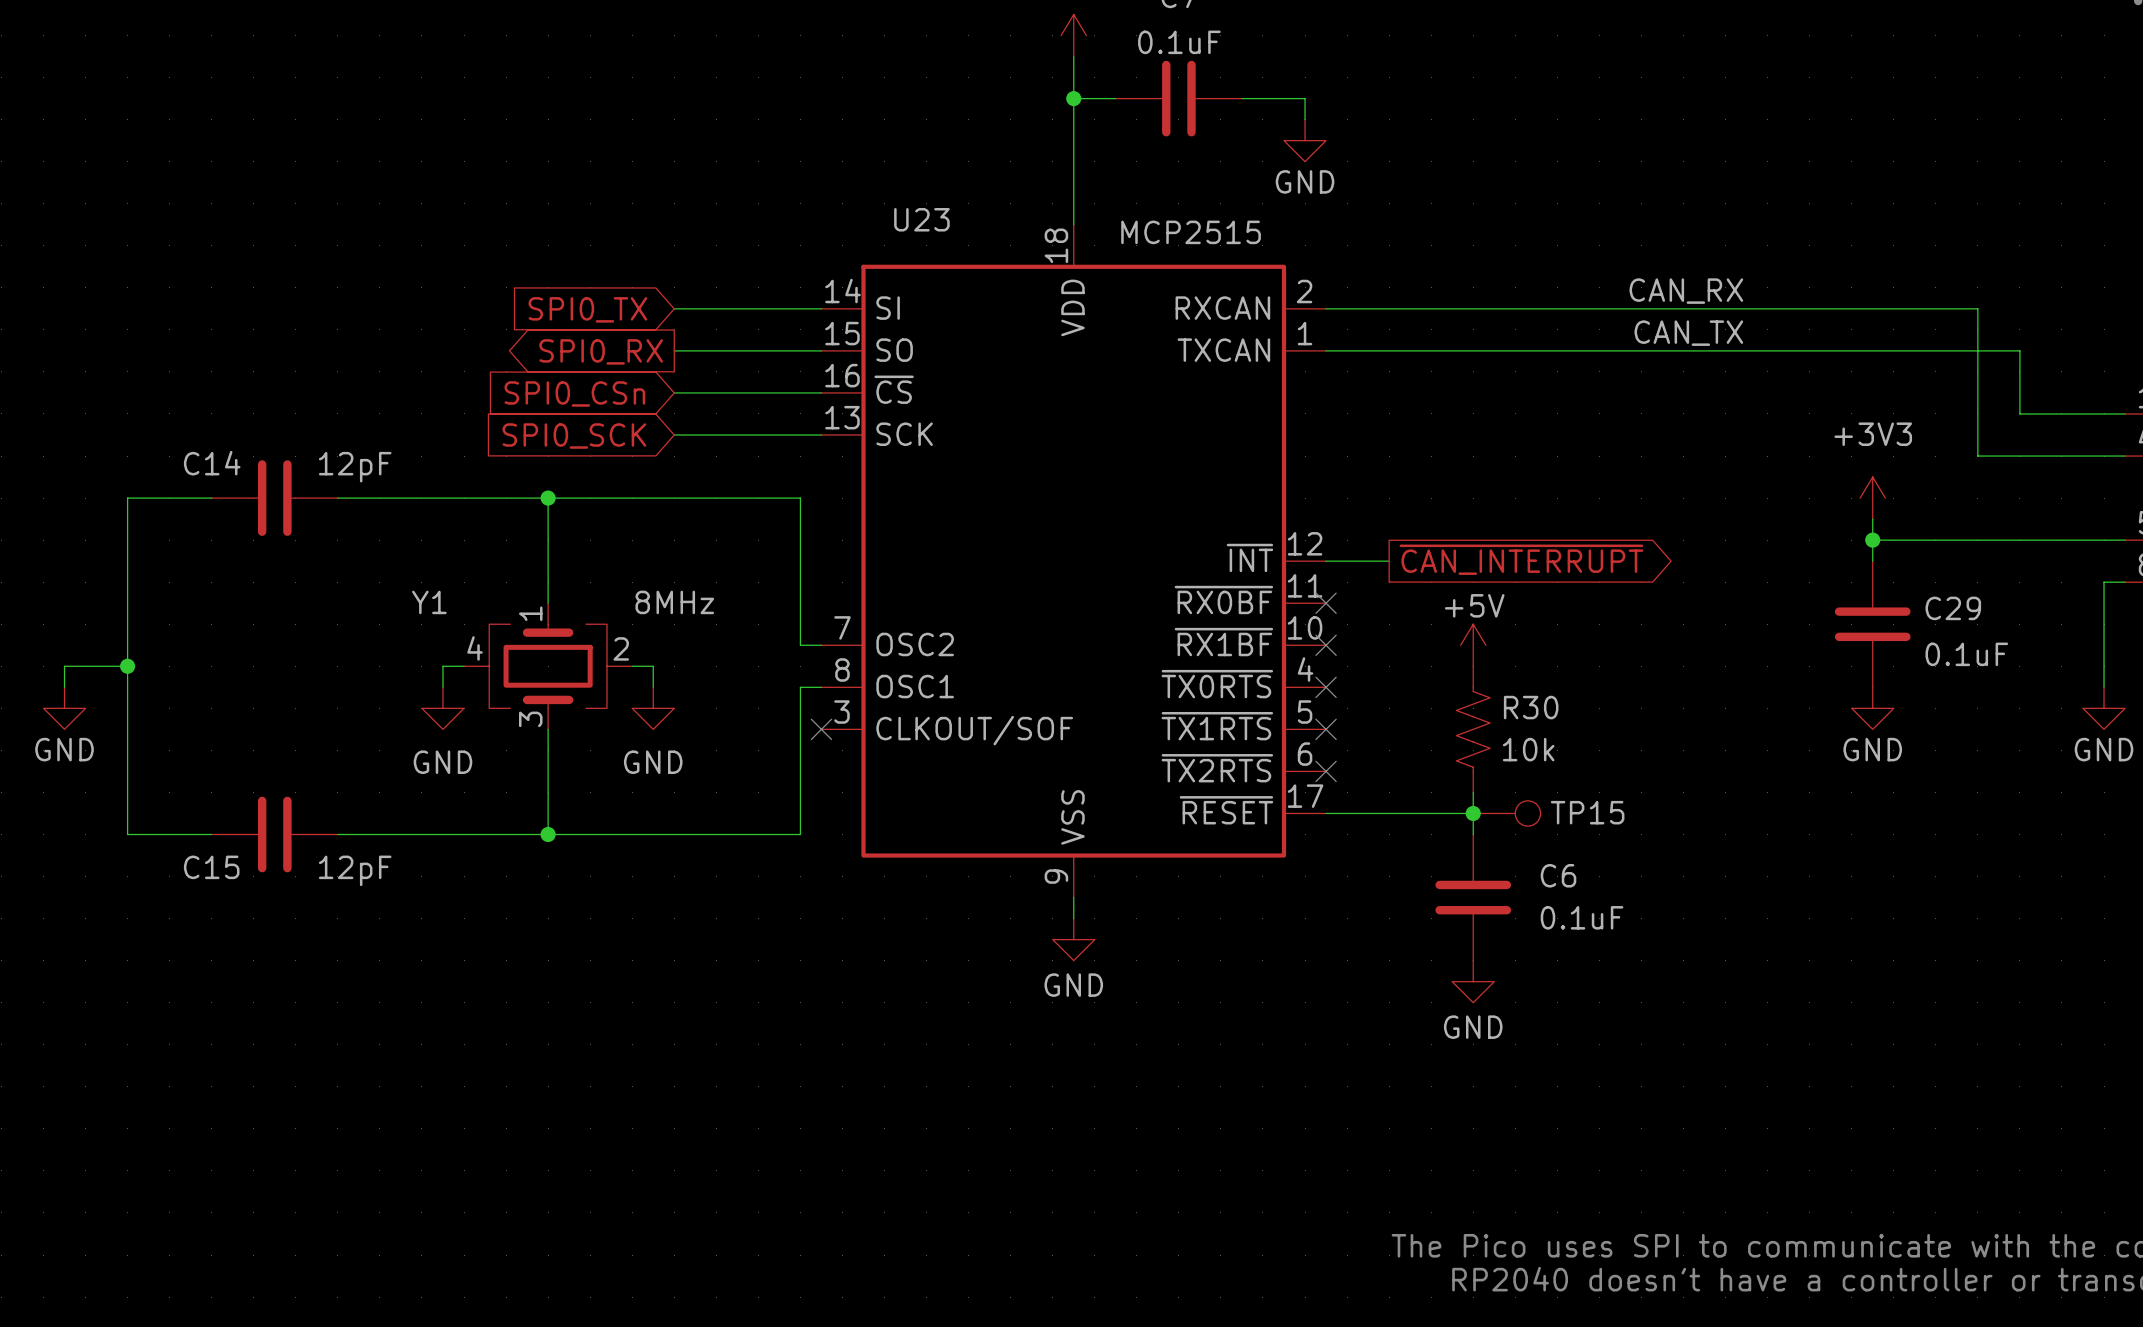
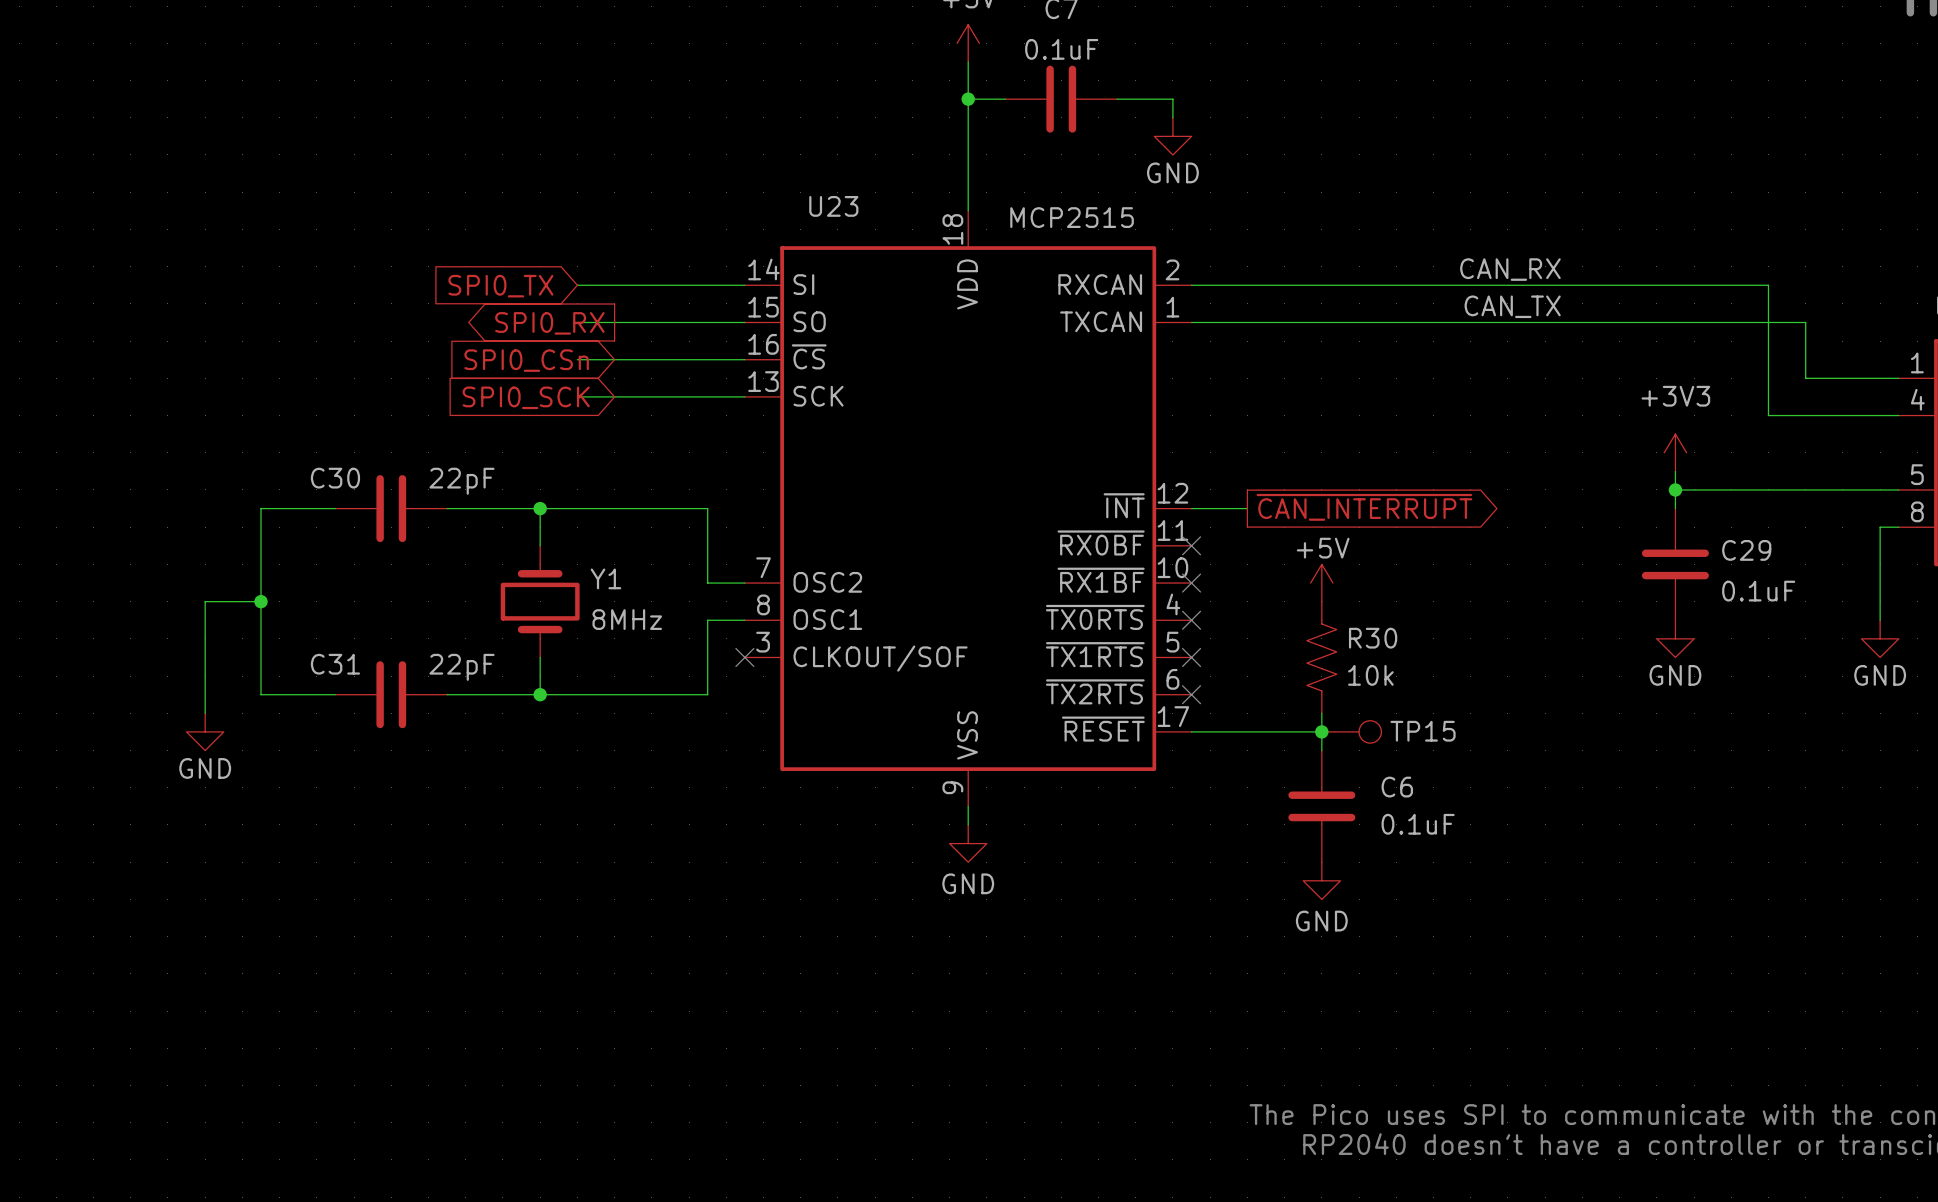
wire: none -> (577, 285) (614, 285)
global label position: SPI0_TX (587, 309) -> SPI0_TX (500, 286)
wire: none -> (577, 322) (614, 322)
wire: none -> (577, 359) (614, 359)
wire: none -> (577, 396) (614, 396)
wire: (211, 498) (127, 498) (127, 834) (211, 834) -> none
C14: 12pF (274, 498) -> none
wire: (337, 498) (800, 498) (800, 645) -> (447, 508) (707, 508) (707, 583) (726, 583)
wire: (548, 498) (548, 603) -> none
junction position: (548, 498) -> (540, 508)
wire: none -> (335, 508) (261, 508) (261, 694) (335, 694)
C30: none -> 22pF (391, 508)
wire: none -> (540, 508) (540, 545)
Y1 name position: Y1 (429, 602) -> Y1 (605, 578)
Y1 value position: 8MHz (674, 602) -> 8MHz (627, 619)
Y1 symbol: [464, 603, 633, 730] -> [500, 545, 580, 658]
wire: (127, 666) (64, 666) (64, 687) -> none
junction: (127, 666) -> none
wire: none -> (261, 601) (205, 601) (205, 713)
junction: none -> (261, 601)
wire: (464, 666) (442, 666) (442, 687) -> none
wire: (632, 666) (653, 666) (653, 687) -> none
wire: (800, 687) (800, 834) (337, 834) -> (726, 620) (707, 620) (707, 694) (447, 694)
power symbol: GND (64, 708) -> none
power symbol: GND (442, 708) -> none
power symbol: GND (653, 708) -> none
wire: (548, 729) (548, 834) -> none
wire: none -> (540, 657) (540, 694)
C31: none -> 22pF (391, 694)
power symbol: none -> GND (205, 731)
C15: 12pF (274, 834) -> none
junction position: (548, 834) -> (540, 694)

